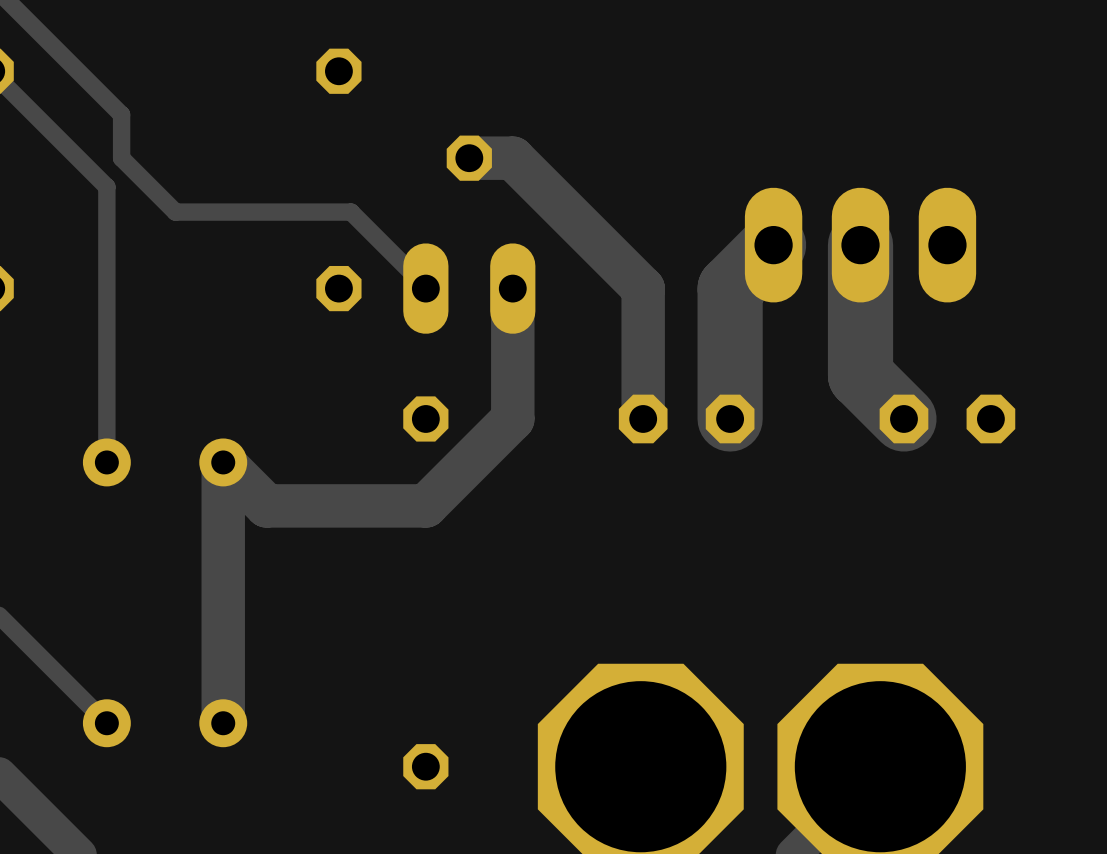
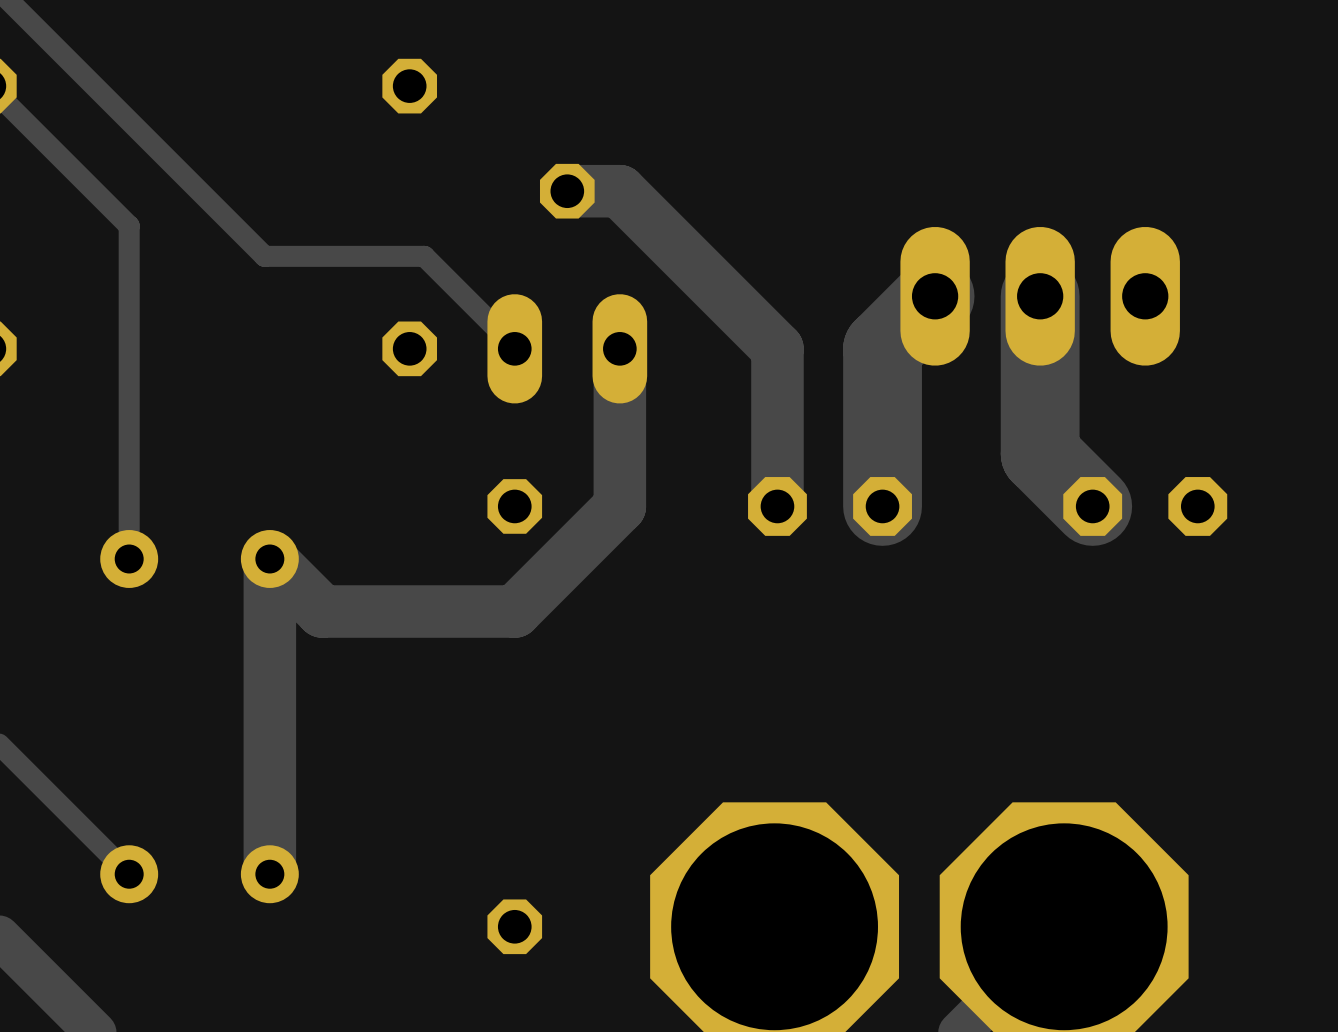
track: (121, 114) (121, 158) (175, 212) (218, 212) -> (146, 138) (264, 256)

